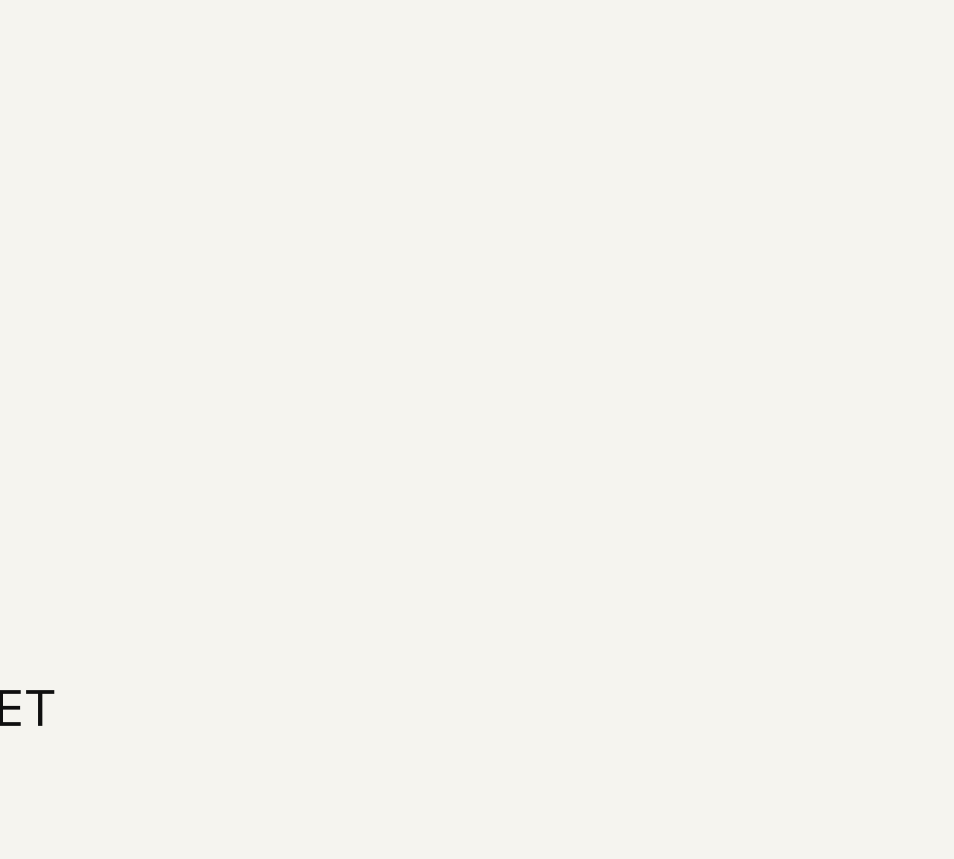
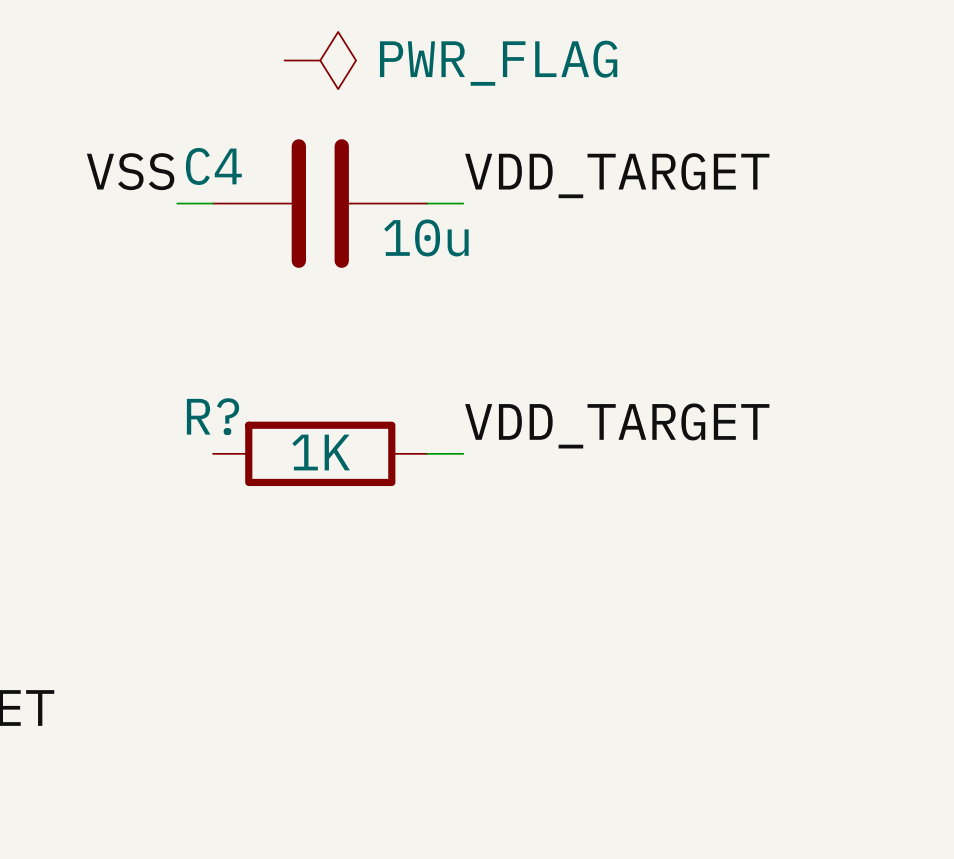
power symbol: none -> PWR_FLAG (320, 60)
label: none -> VSS (130, 171)
label: none -> VDD_TARGET (617, 175)
wire: none -> (177, 203) (213, 203)
C4: none -> 10u (320, 203)
wire: none -> (427, 203) (463, 203)
label: none -> VDD_TARGET (617, 425)
R?: none -> 1K (320, 453)
wire: none -> (427, 453) (463, 453)

